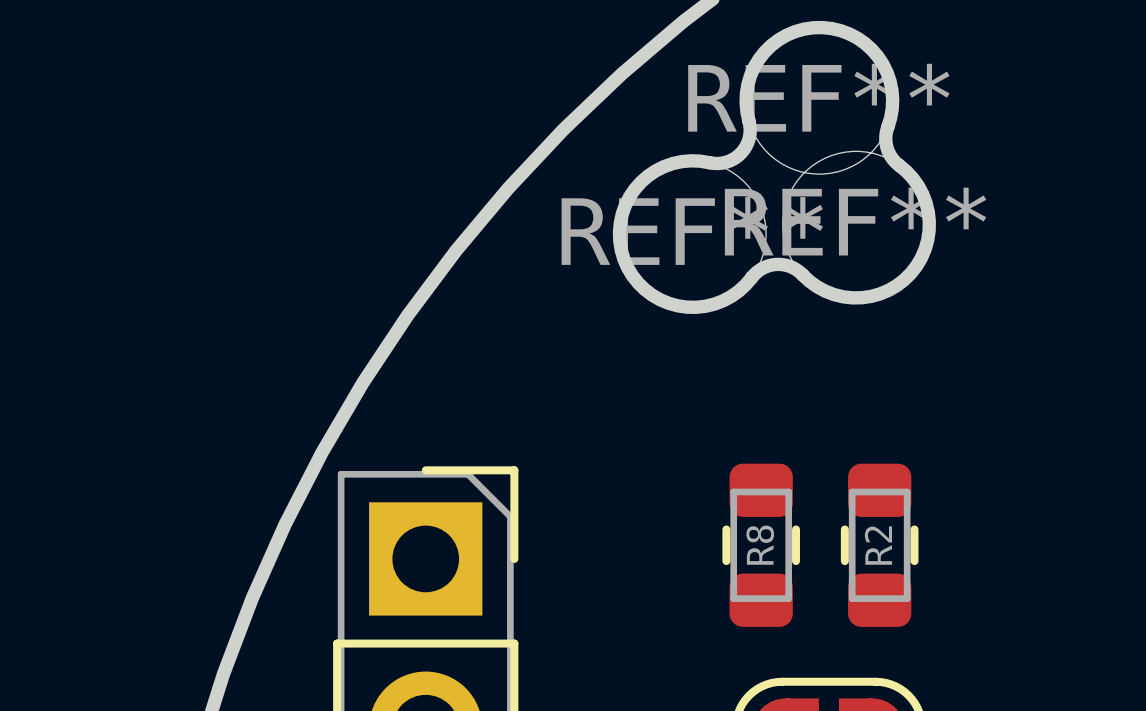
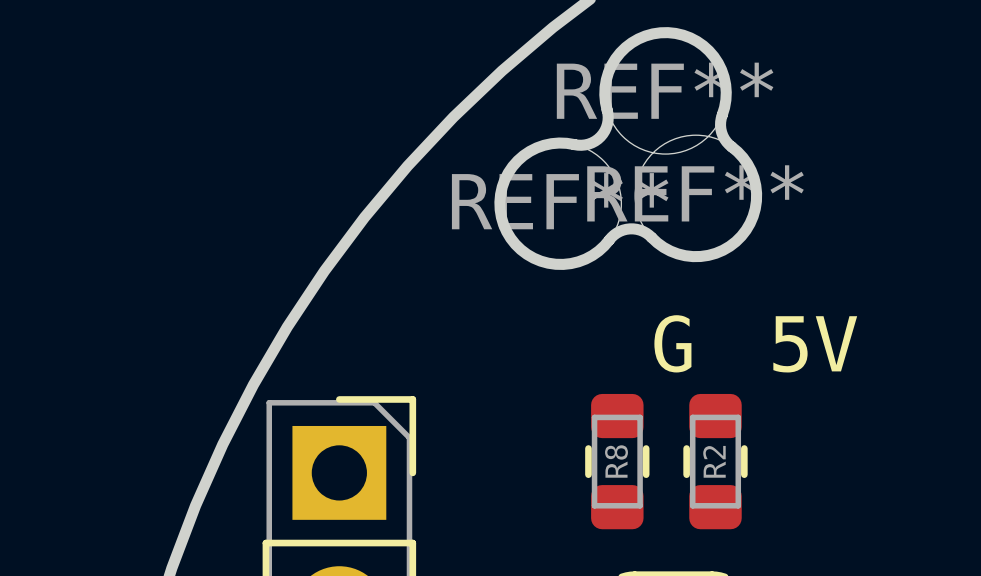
text: none -> G (672, 343)
text: none -> 5V (815, 344)

